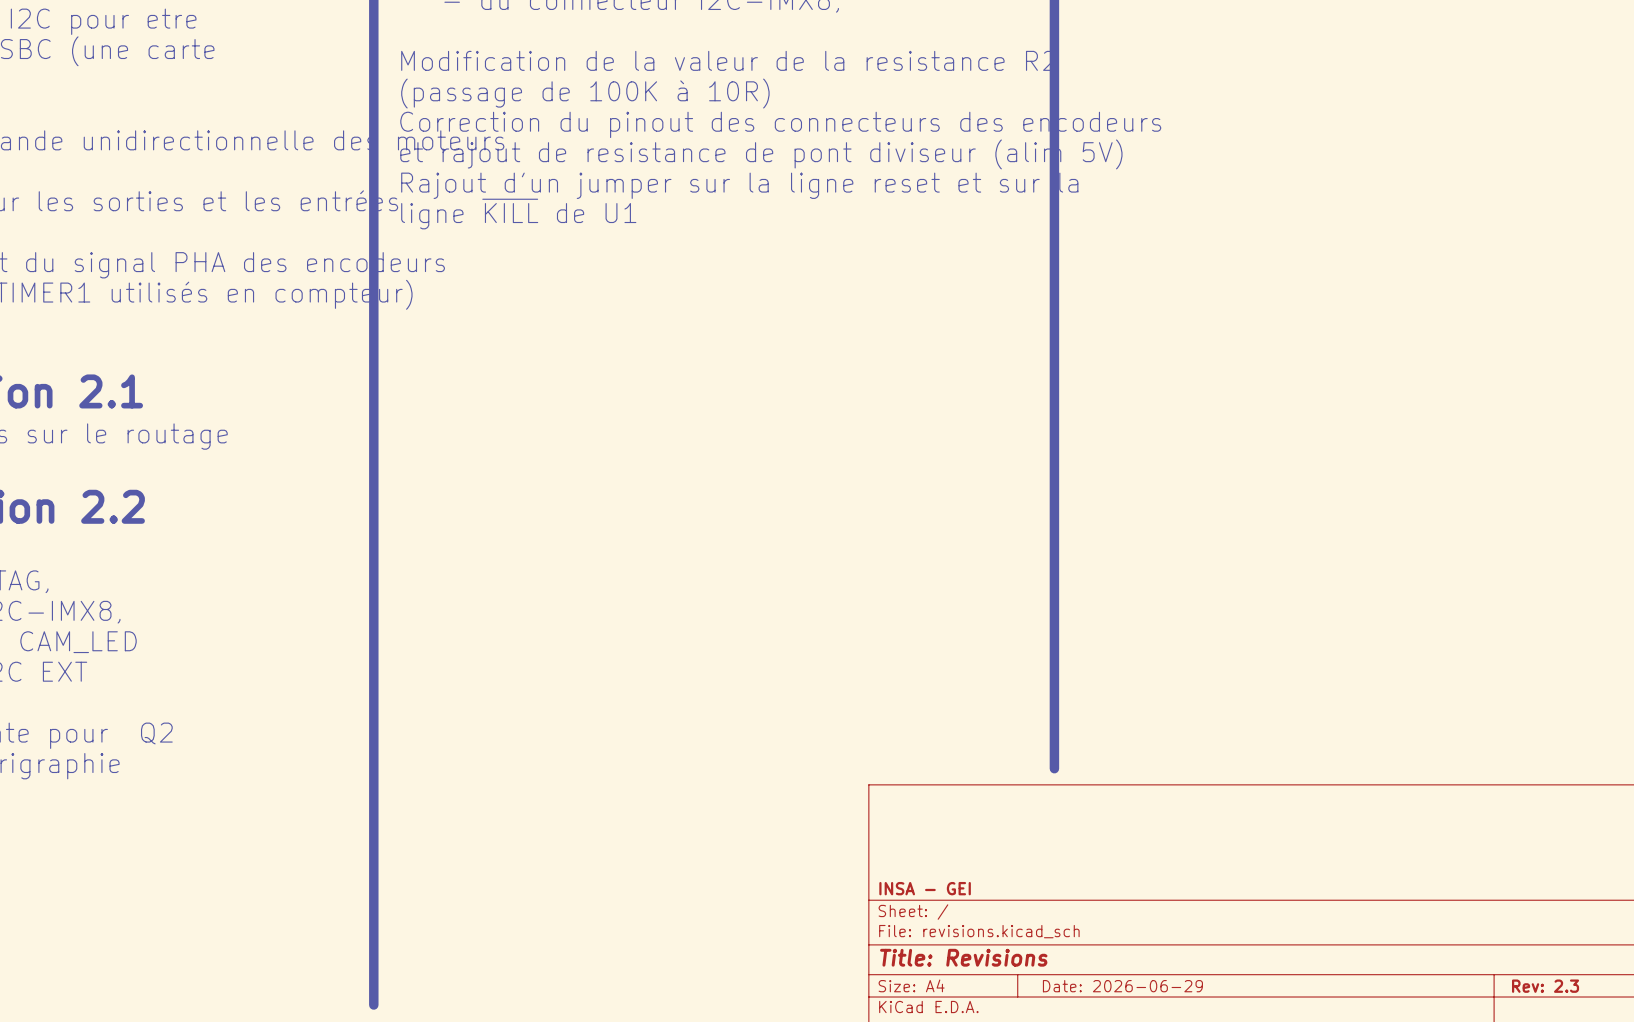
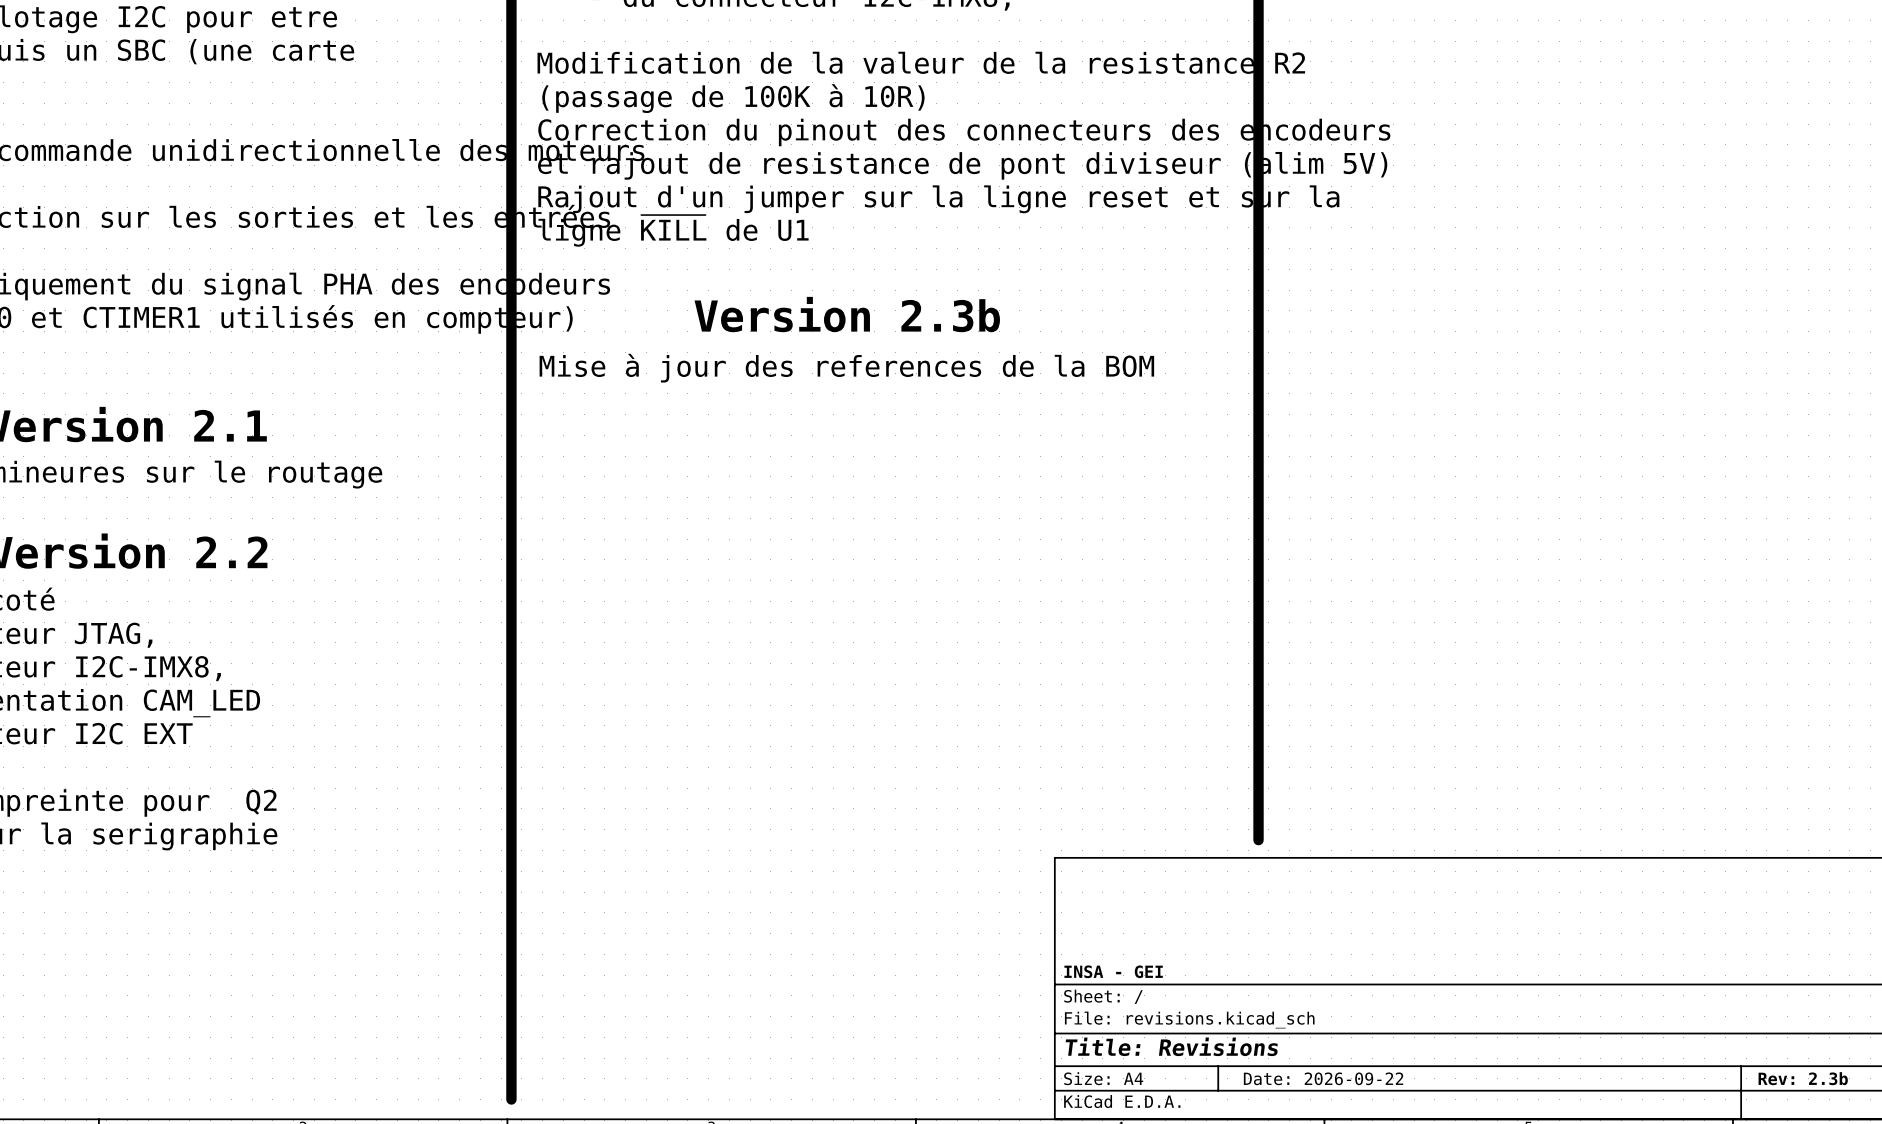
text: none -> Version 2.3b (847, 314)
text: none -> Mise à jour des references de la BOM (846, 368)
title block: Date: 2026-06-29 (1122, 986) -> Date: 2026-09-22 (1323, 1078)
title block: Rev: 2.3 (1545, 986) -> Rev: 2.3b (1803, 1078)

